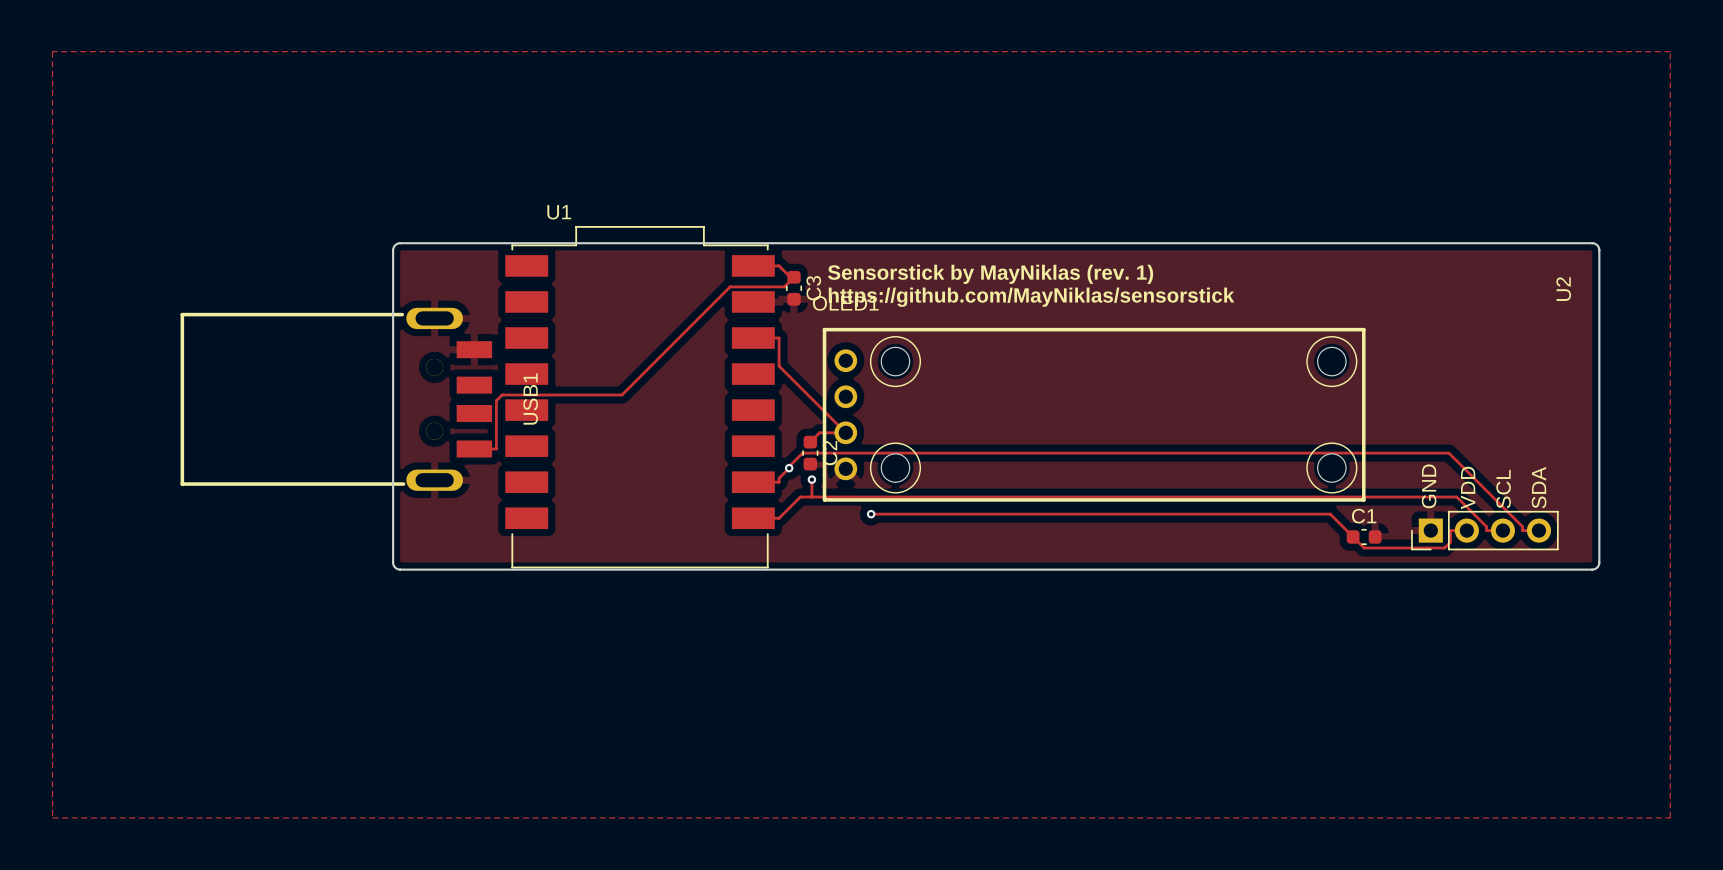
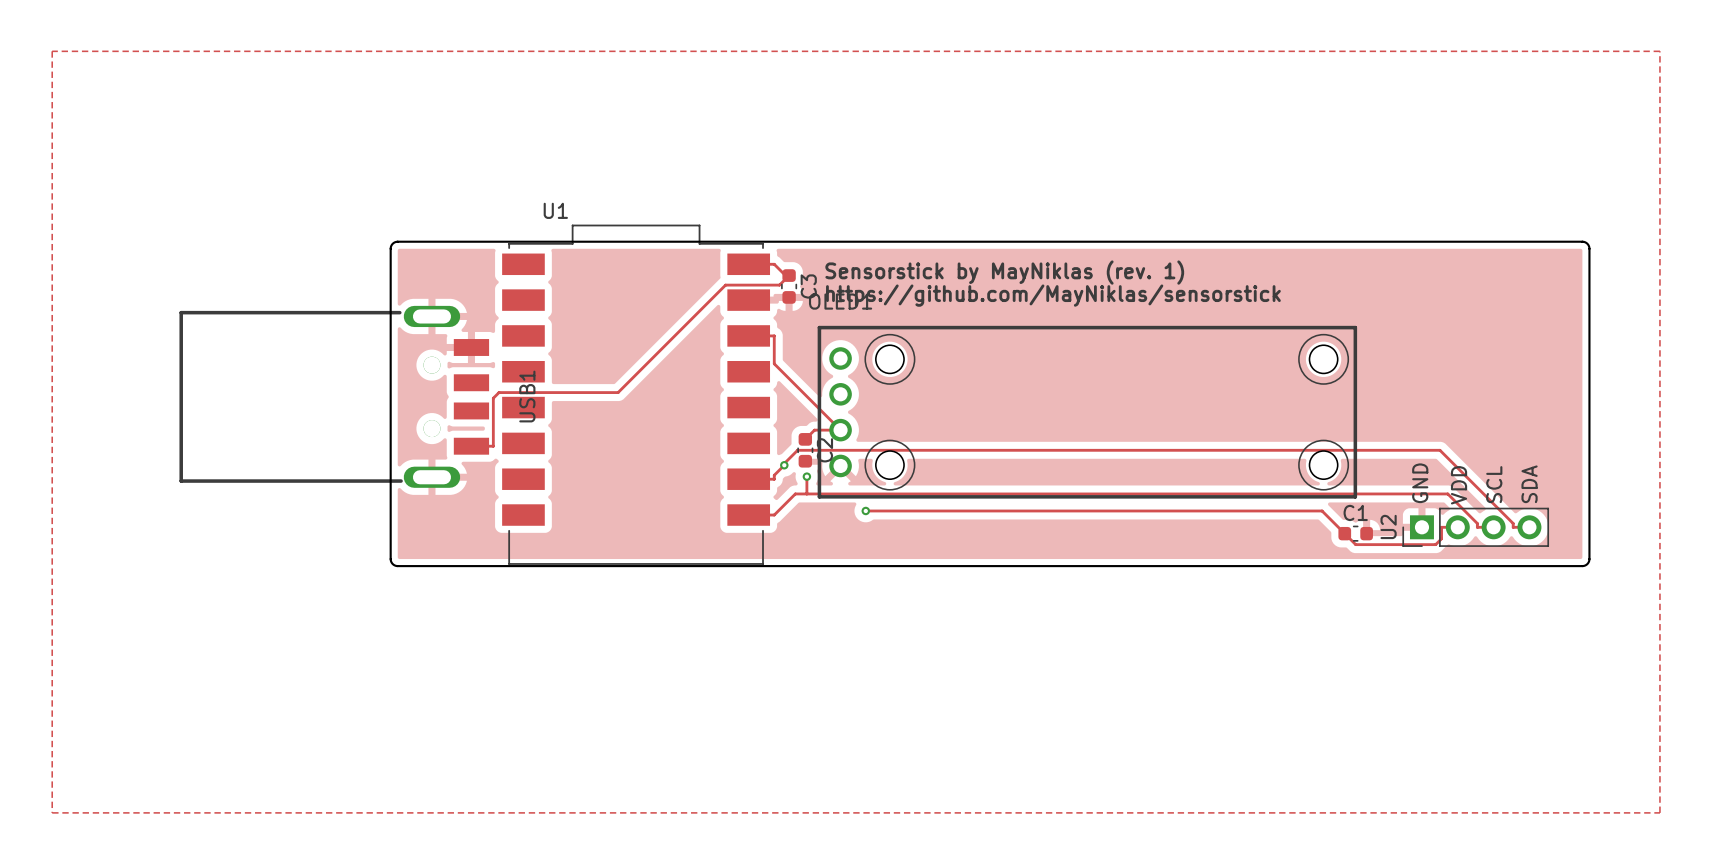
U2 name position: U2 (1563, 289) -> U2 (1388, 526)

